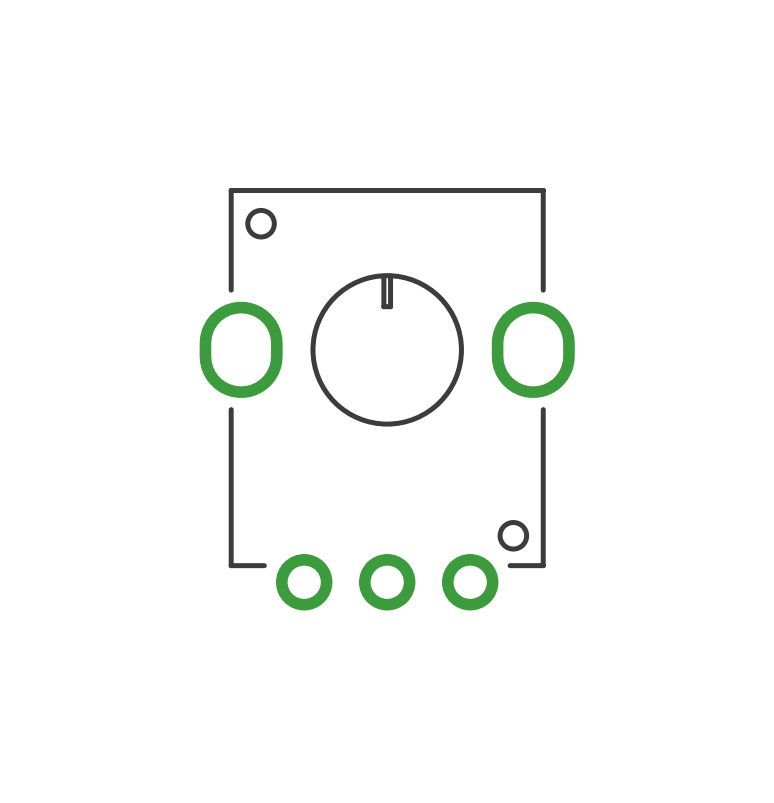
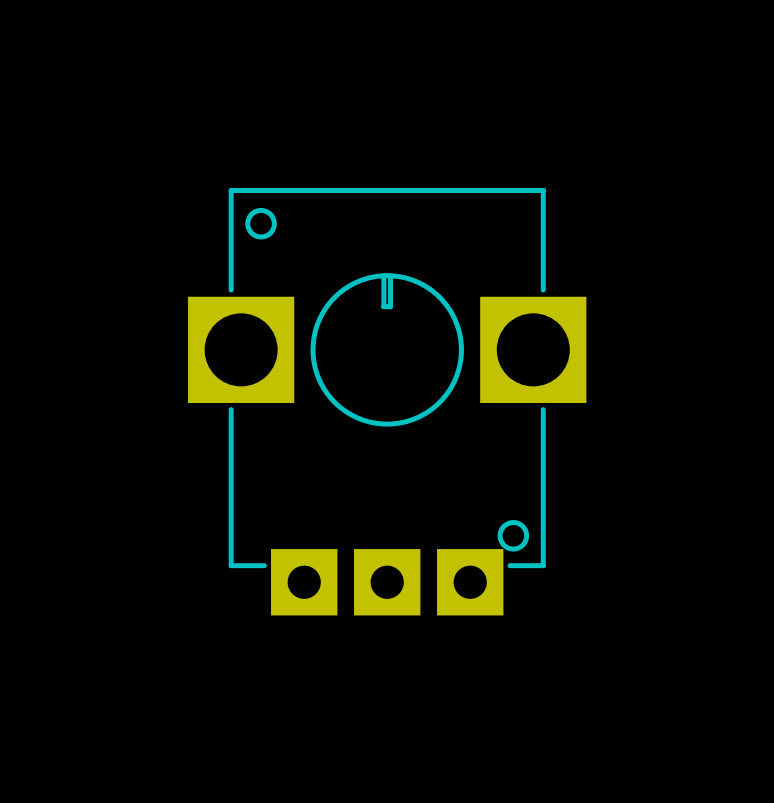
part footprint: [199, 188, 575, 611] -> [188, 188, 587, 616]

